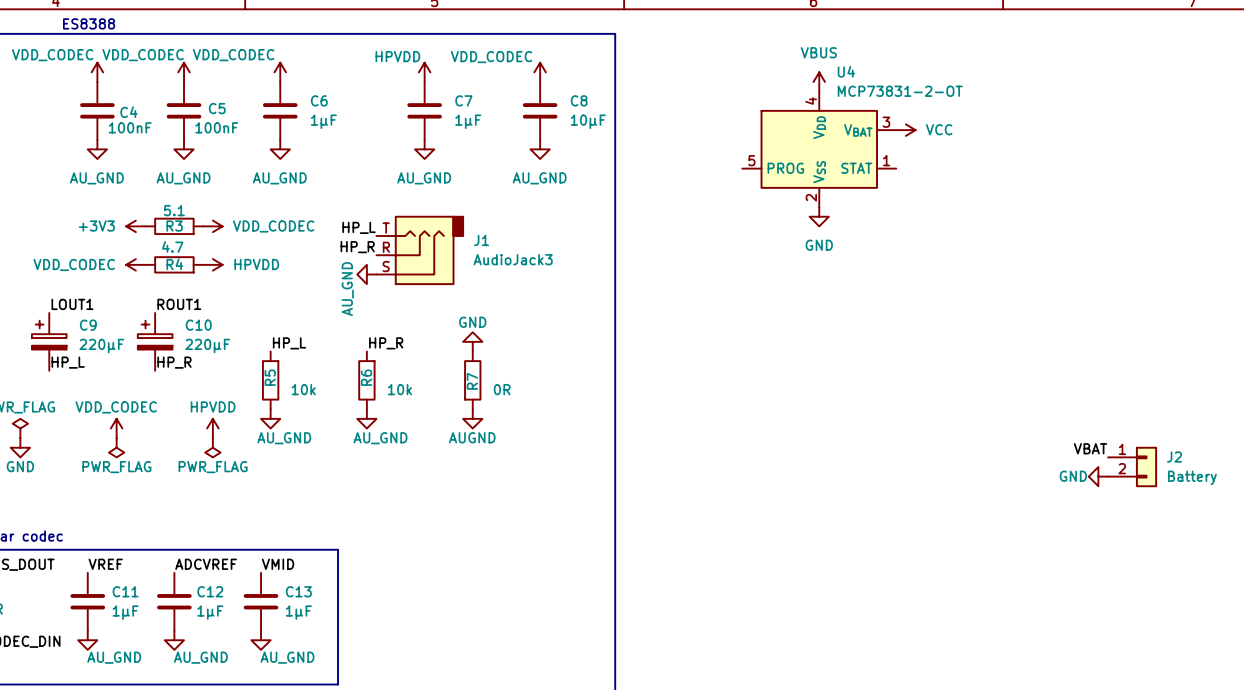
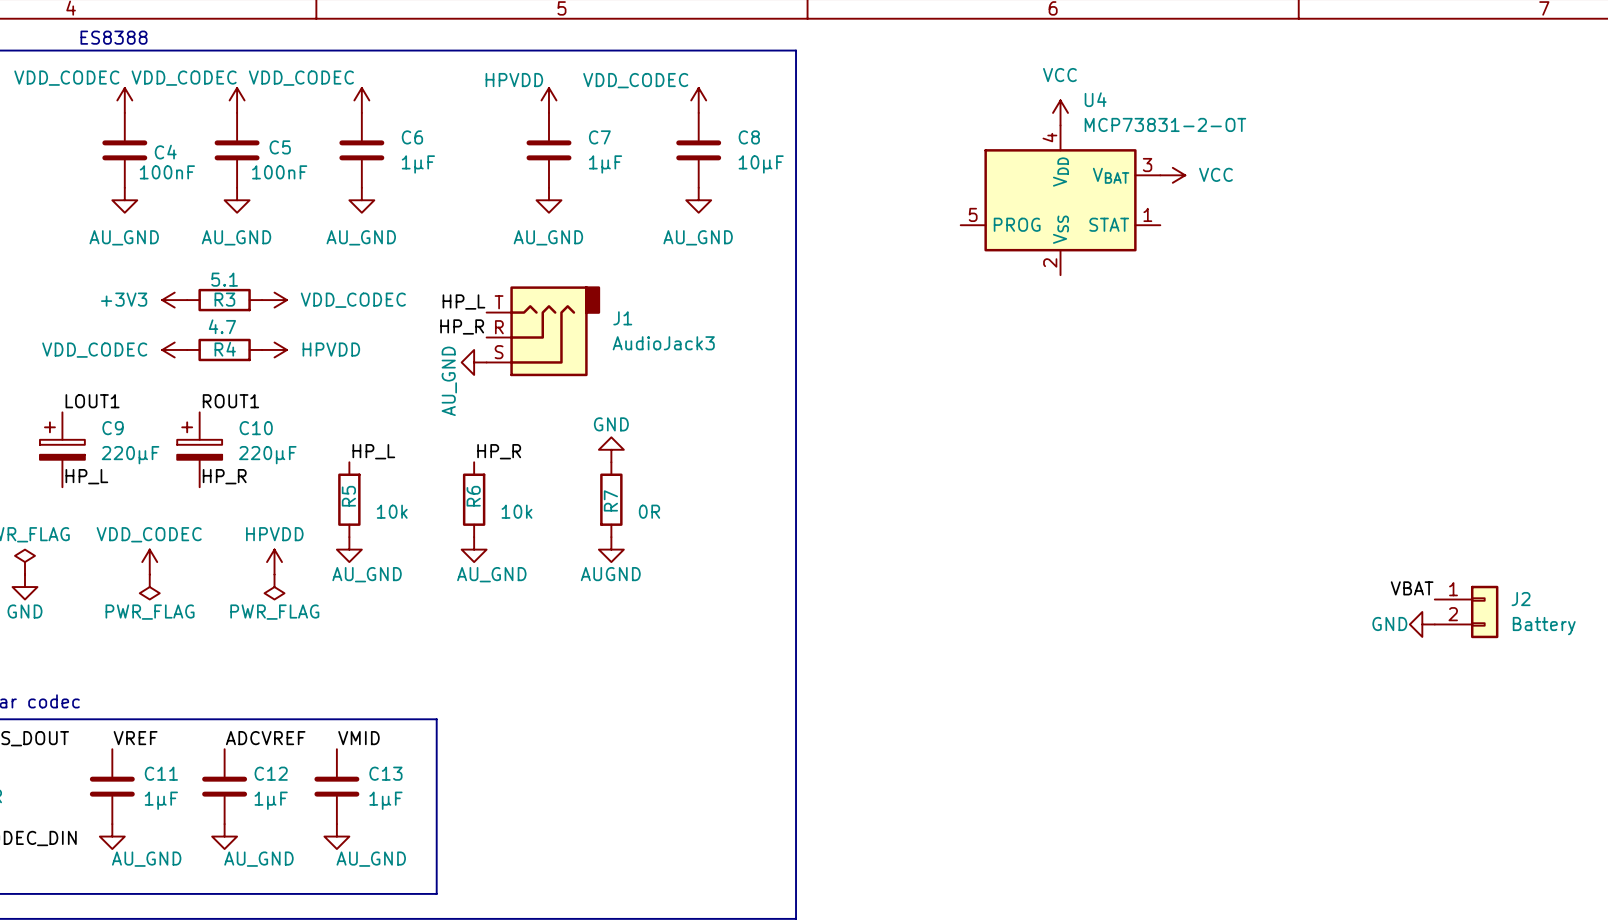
power symbol: VBUS (819, 81) -> VCC (1060, 112)
power symbol: GND (819, 216) -> none

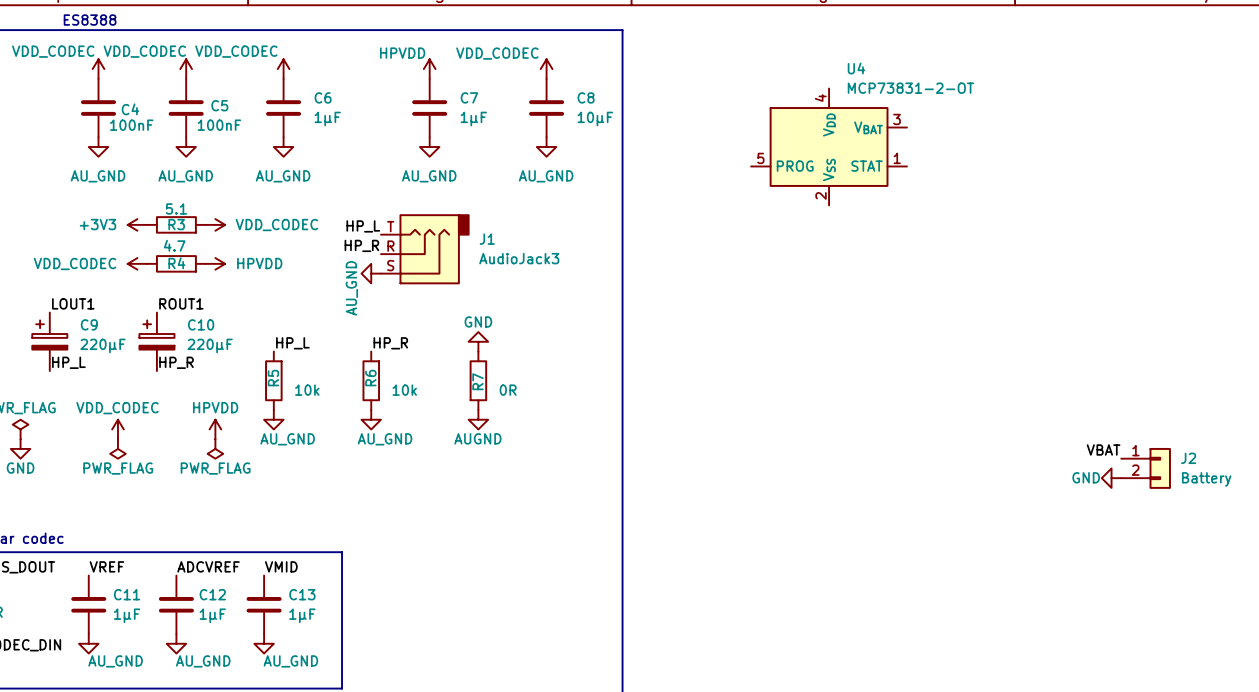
power symbol: VCC (1060, 112) -> none
power symbol: VCC (1172, 175) -> none

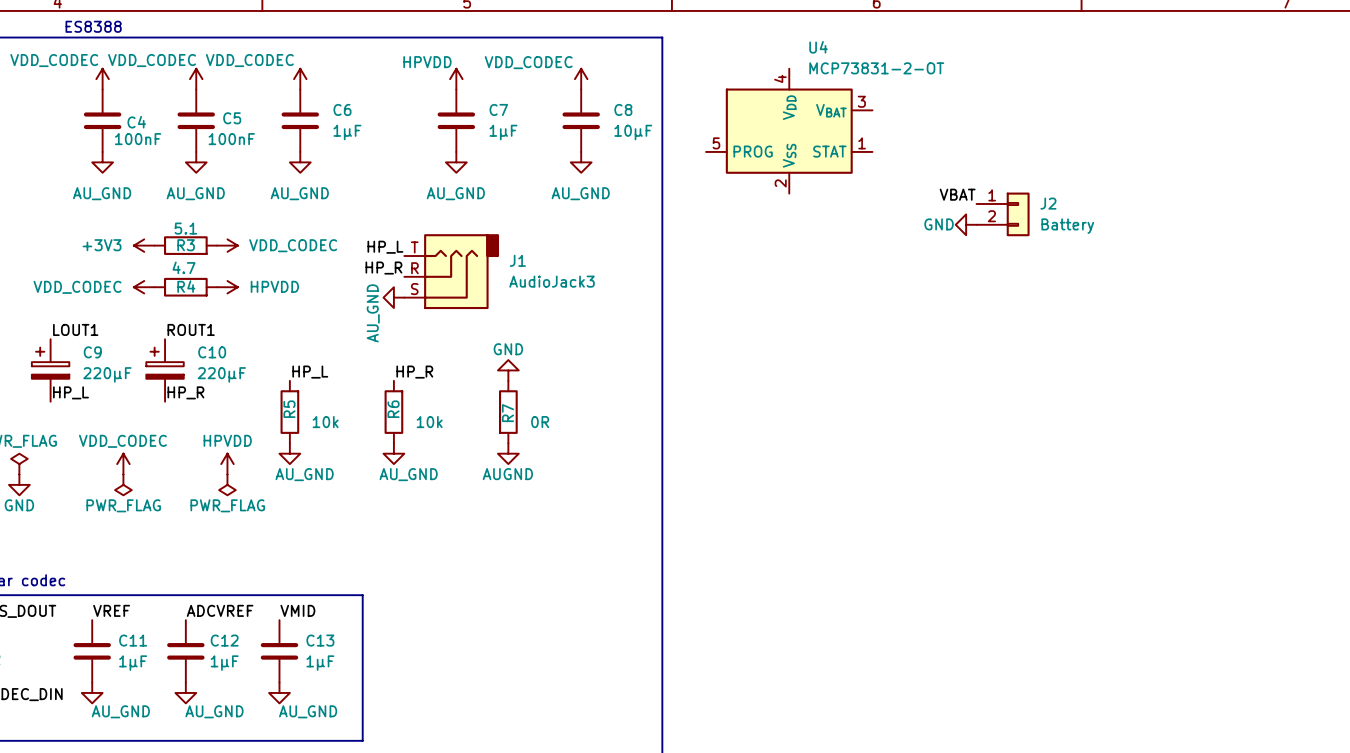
U4 position: (829, 146) -> (789, 131)
label: none -> VBAT (957, 194)
power symbol: none -> GND (966, 224)
label: VBAT (1103, 449) -> none
J2 position: (1146, 468) -> (1003, 214)
power symbol: GND (1111, 478) -> none

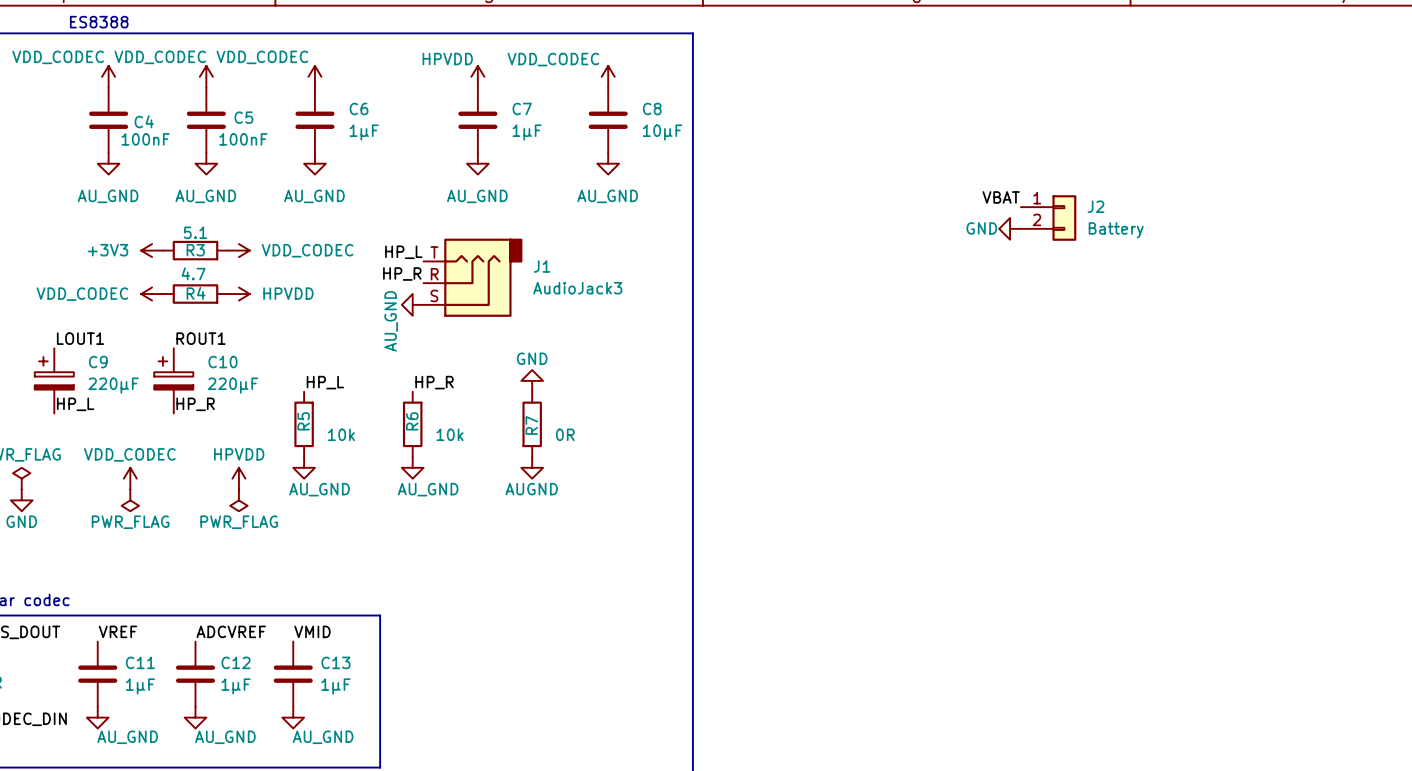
U4: MCP73831-2-OT (789, 131) -> none

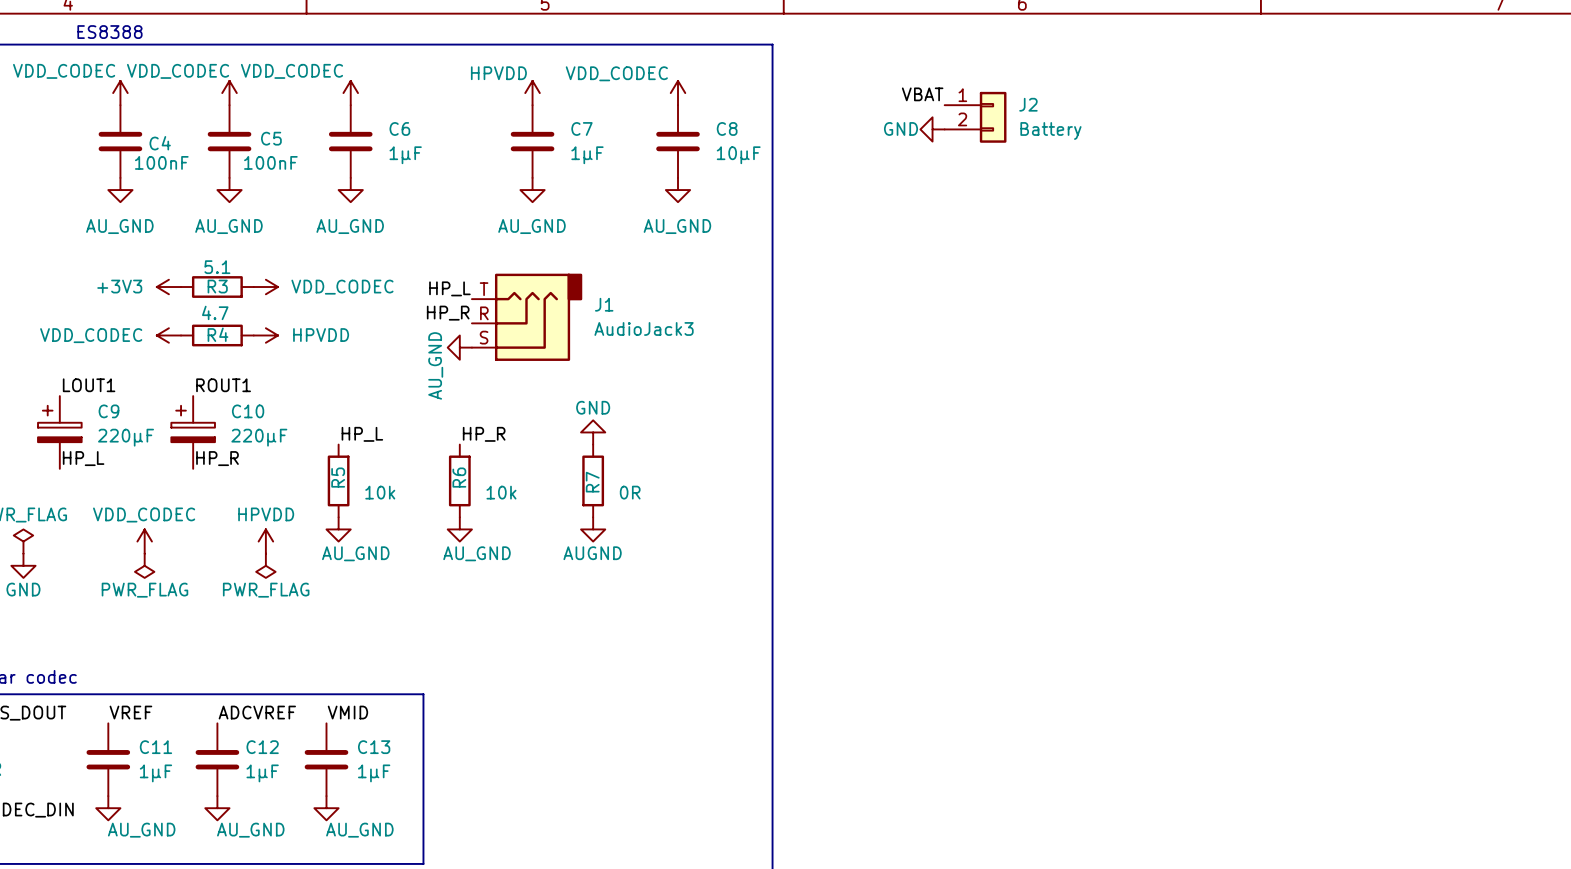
label position: VBAT (1001, 197) -> VBAT (922, 94)
J2 position: (1048, 218) -> (975, 117)
power symbol position: GND (1010, 228) -> GND (932, 129)

